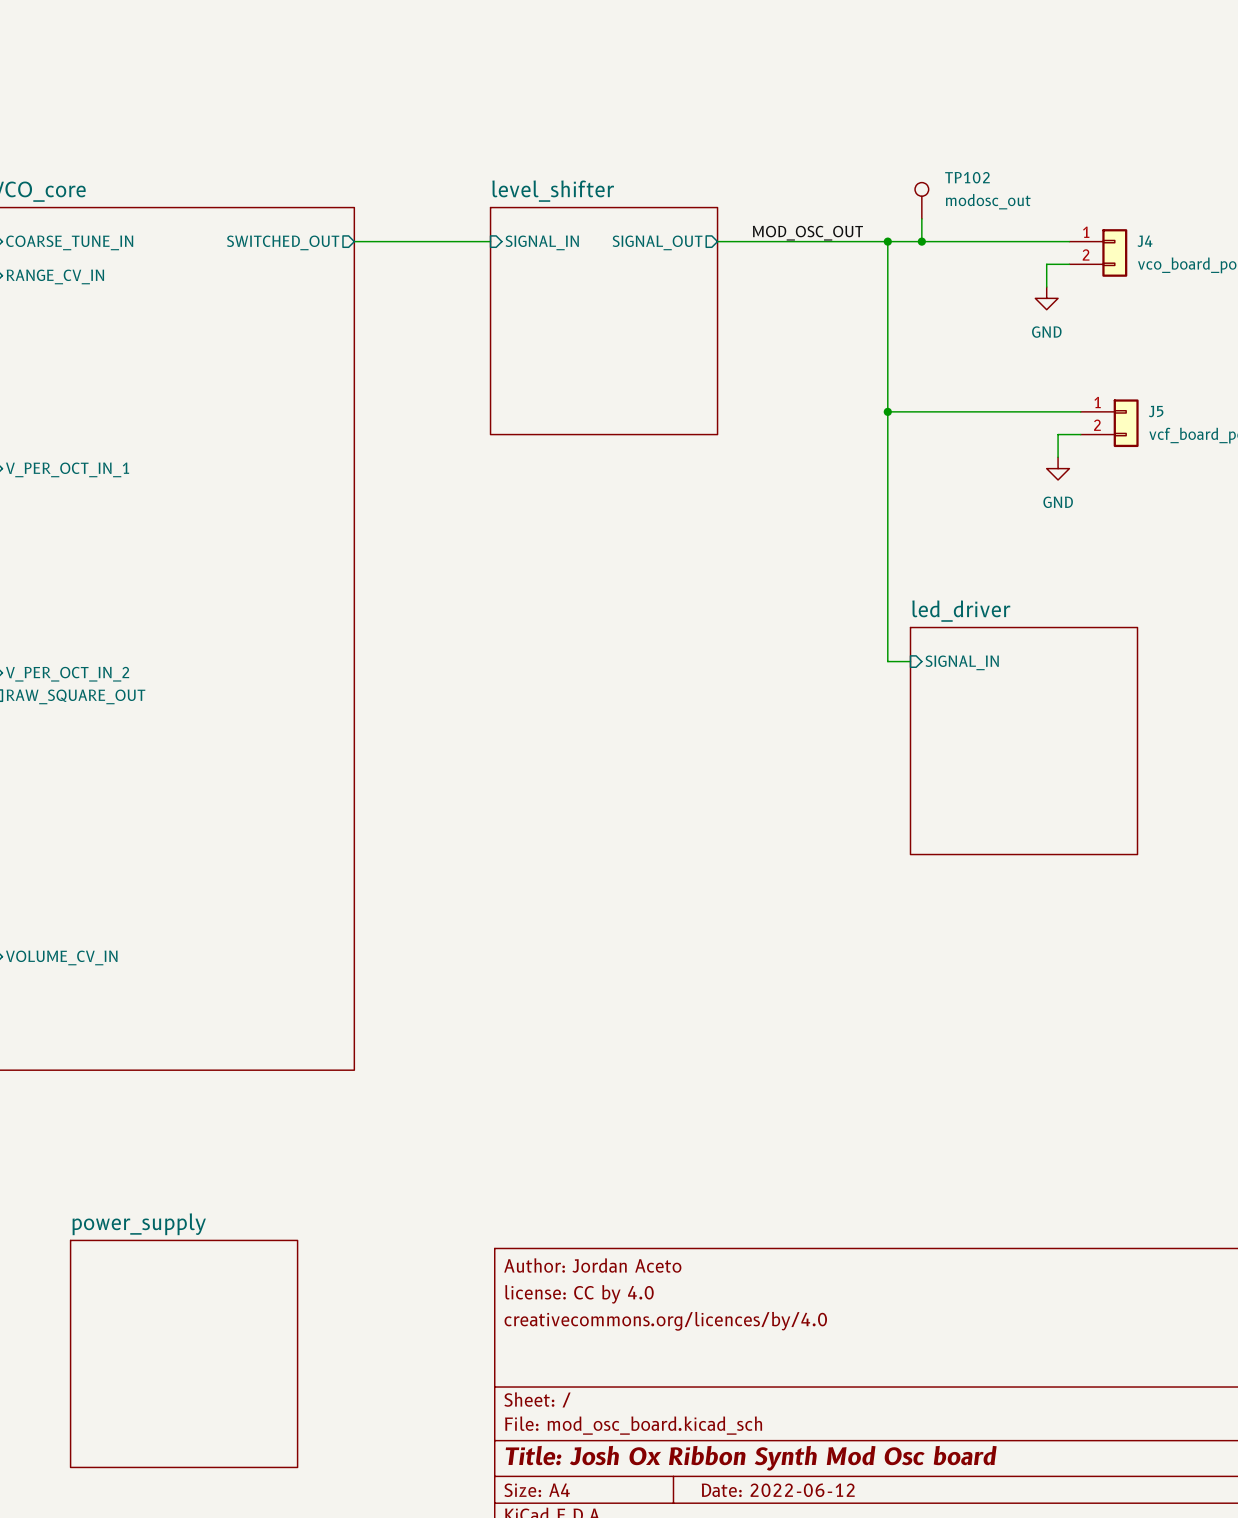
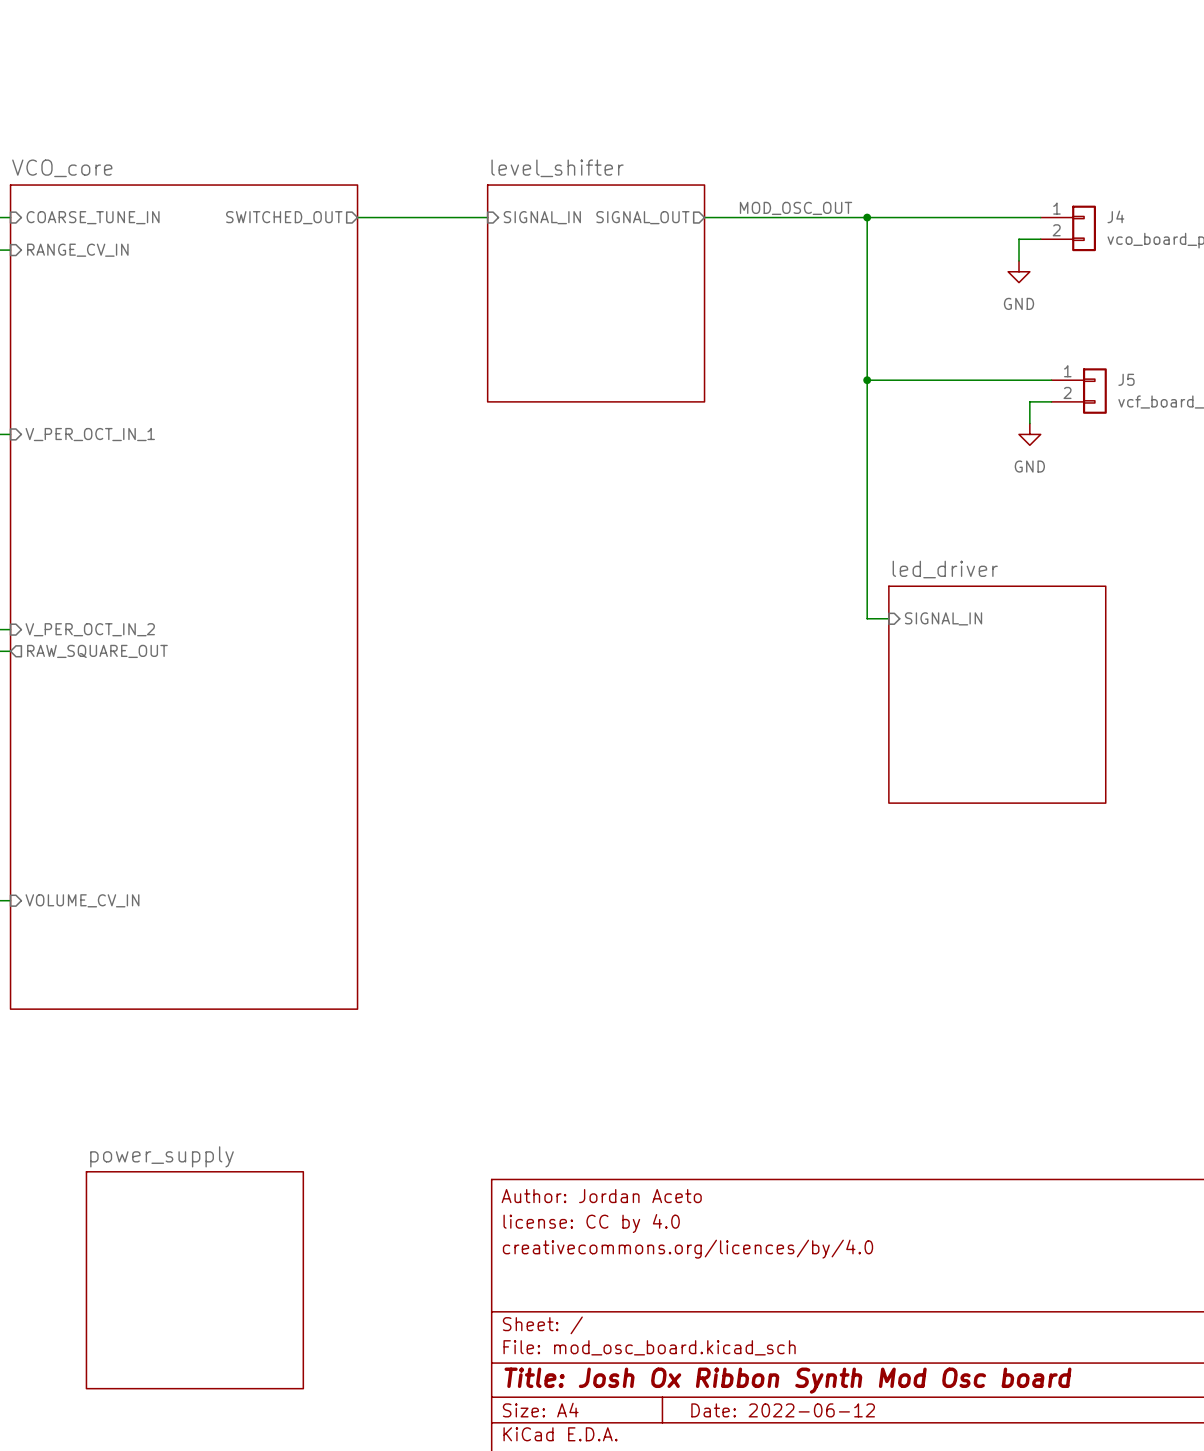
TP102: modosc_out (921, 200) -> none
wire: (921, 218) (921, 241) -> none
junction: (921, 241) -> none

